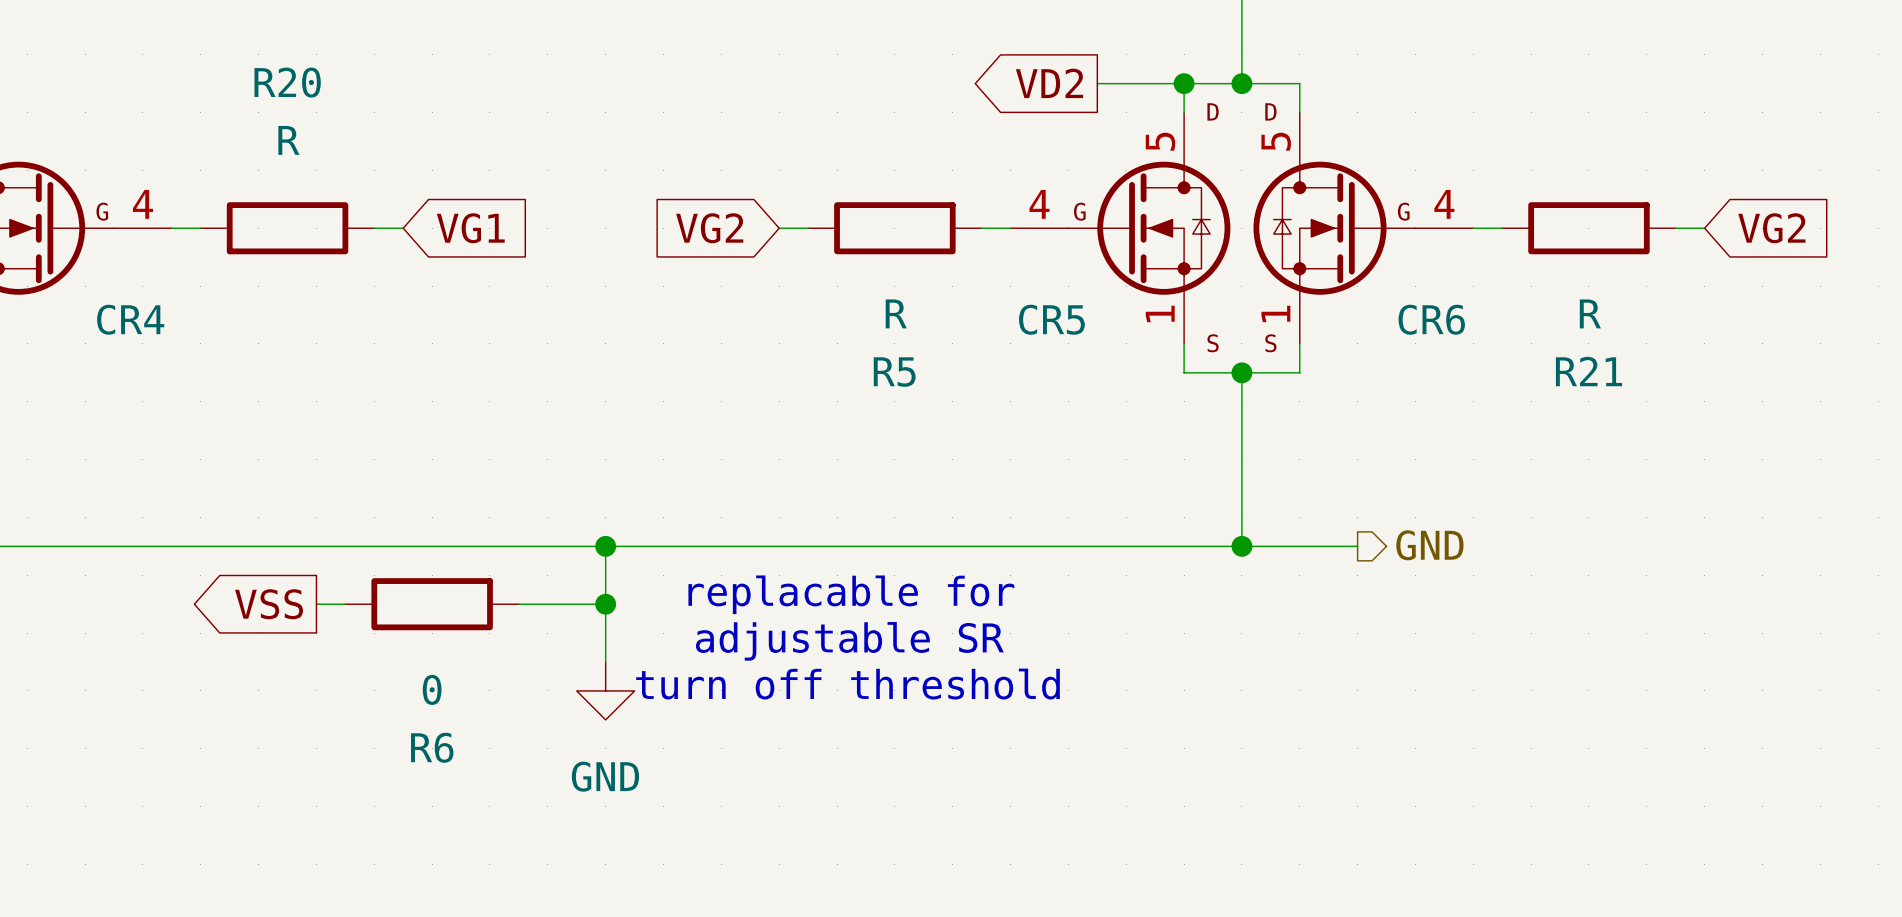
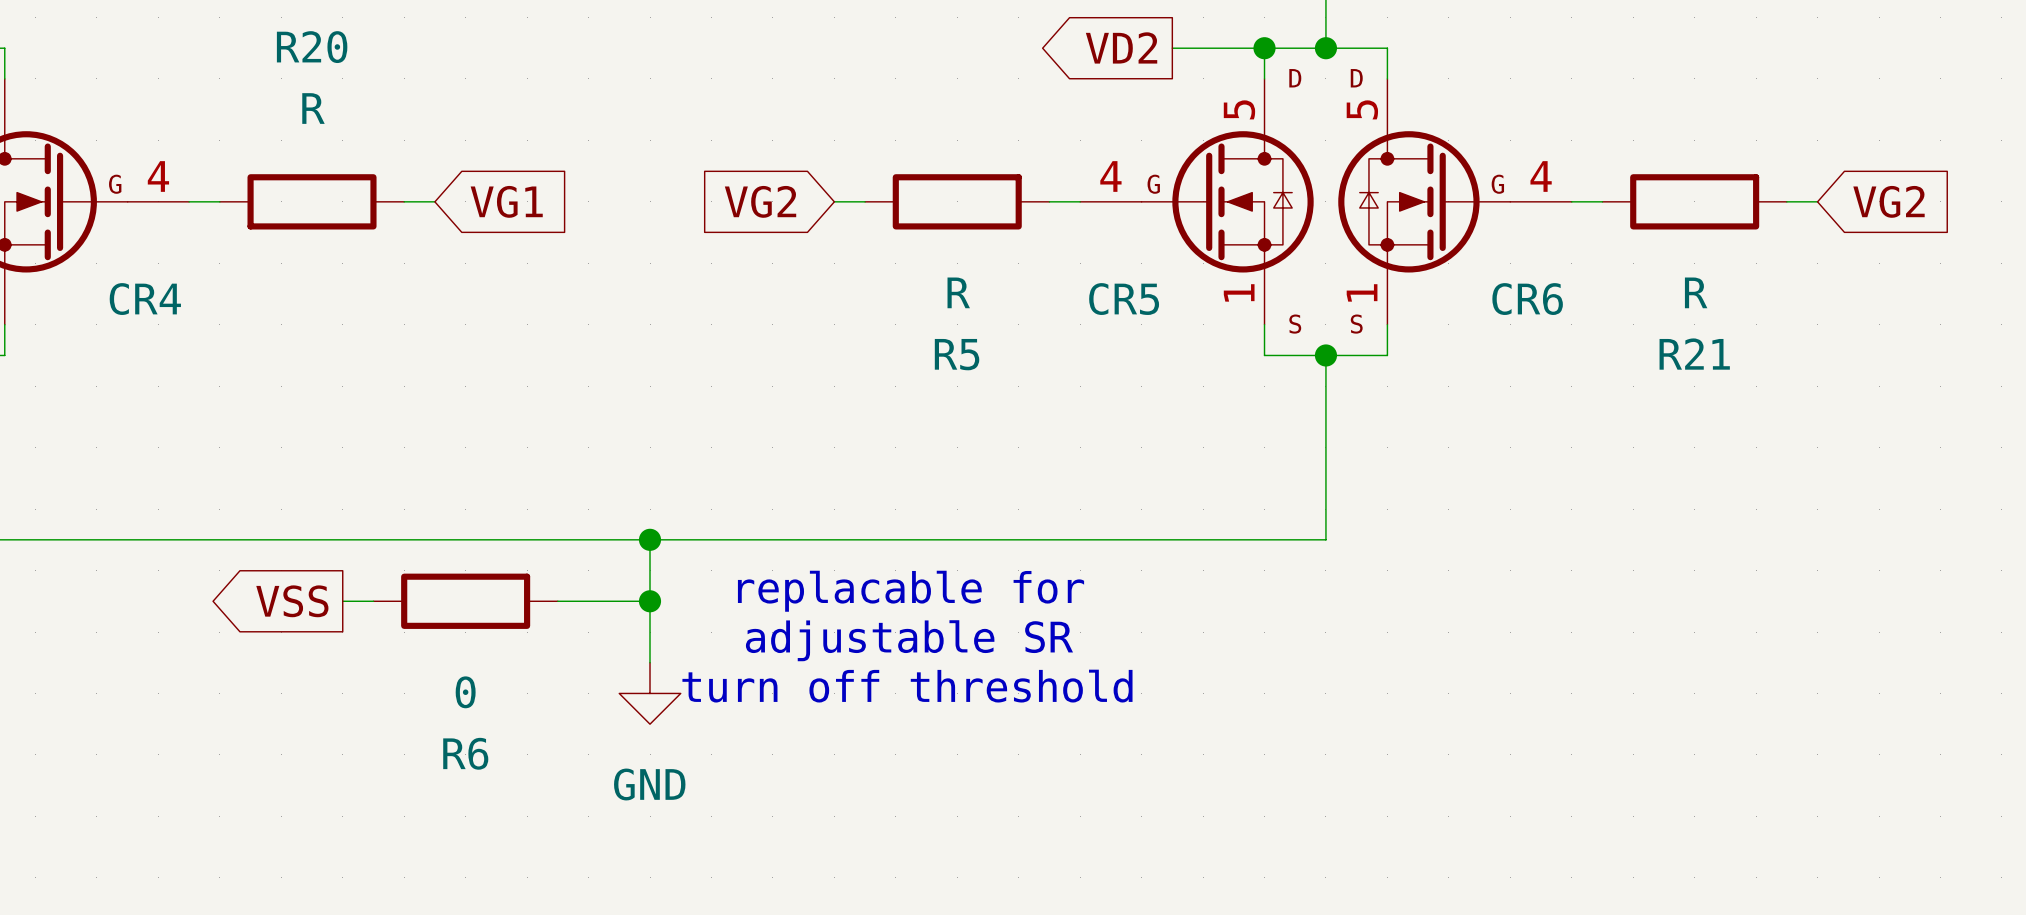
hierarchical label: GND (1429, 545) -> none
wire: (1241, 546) (1357, 546) -> none
junction: (1241, 546) -> none

